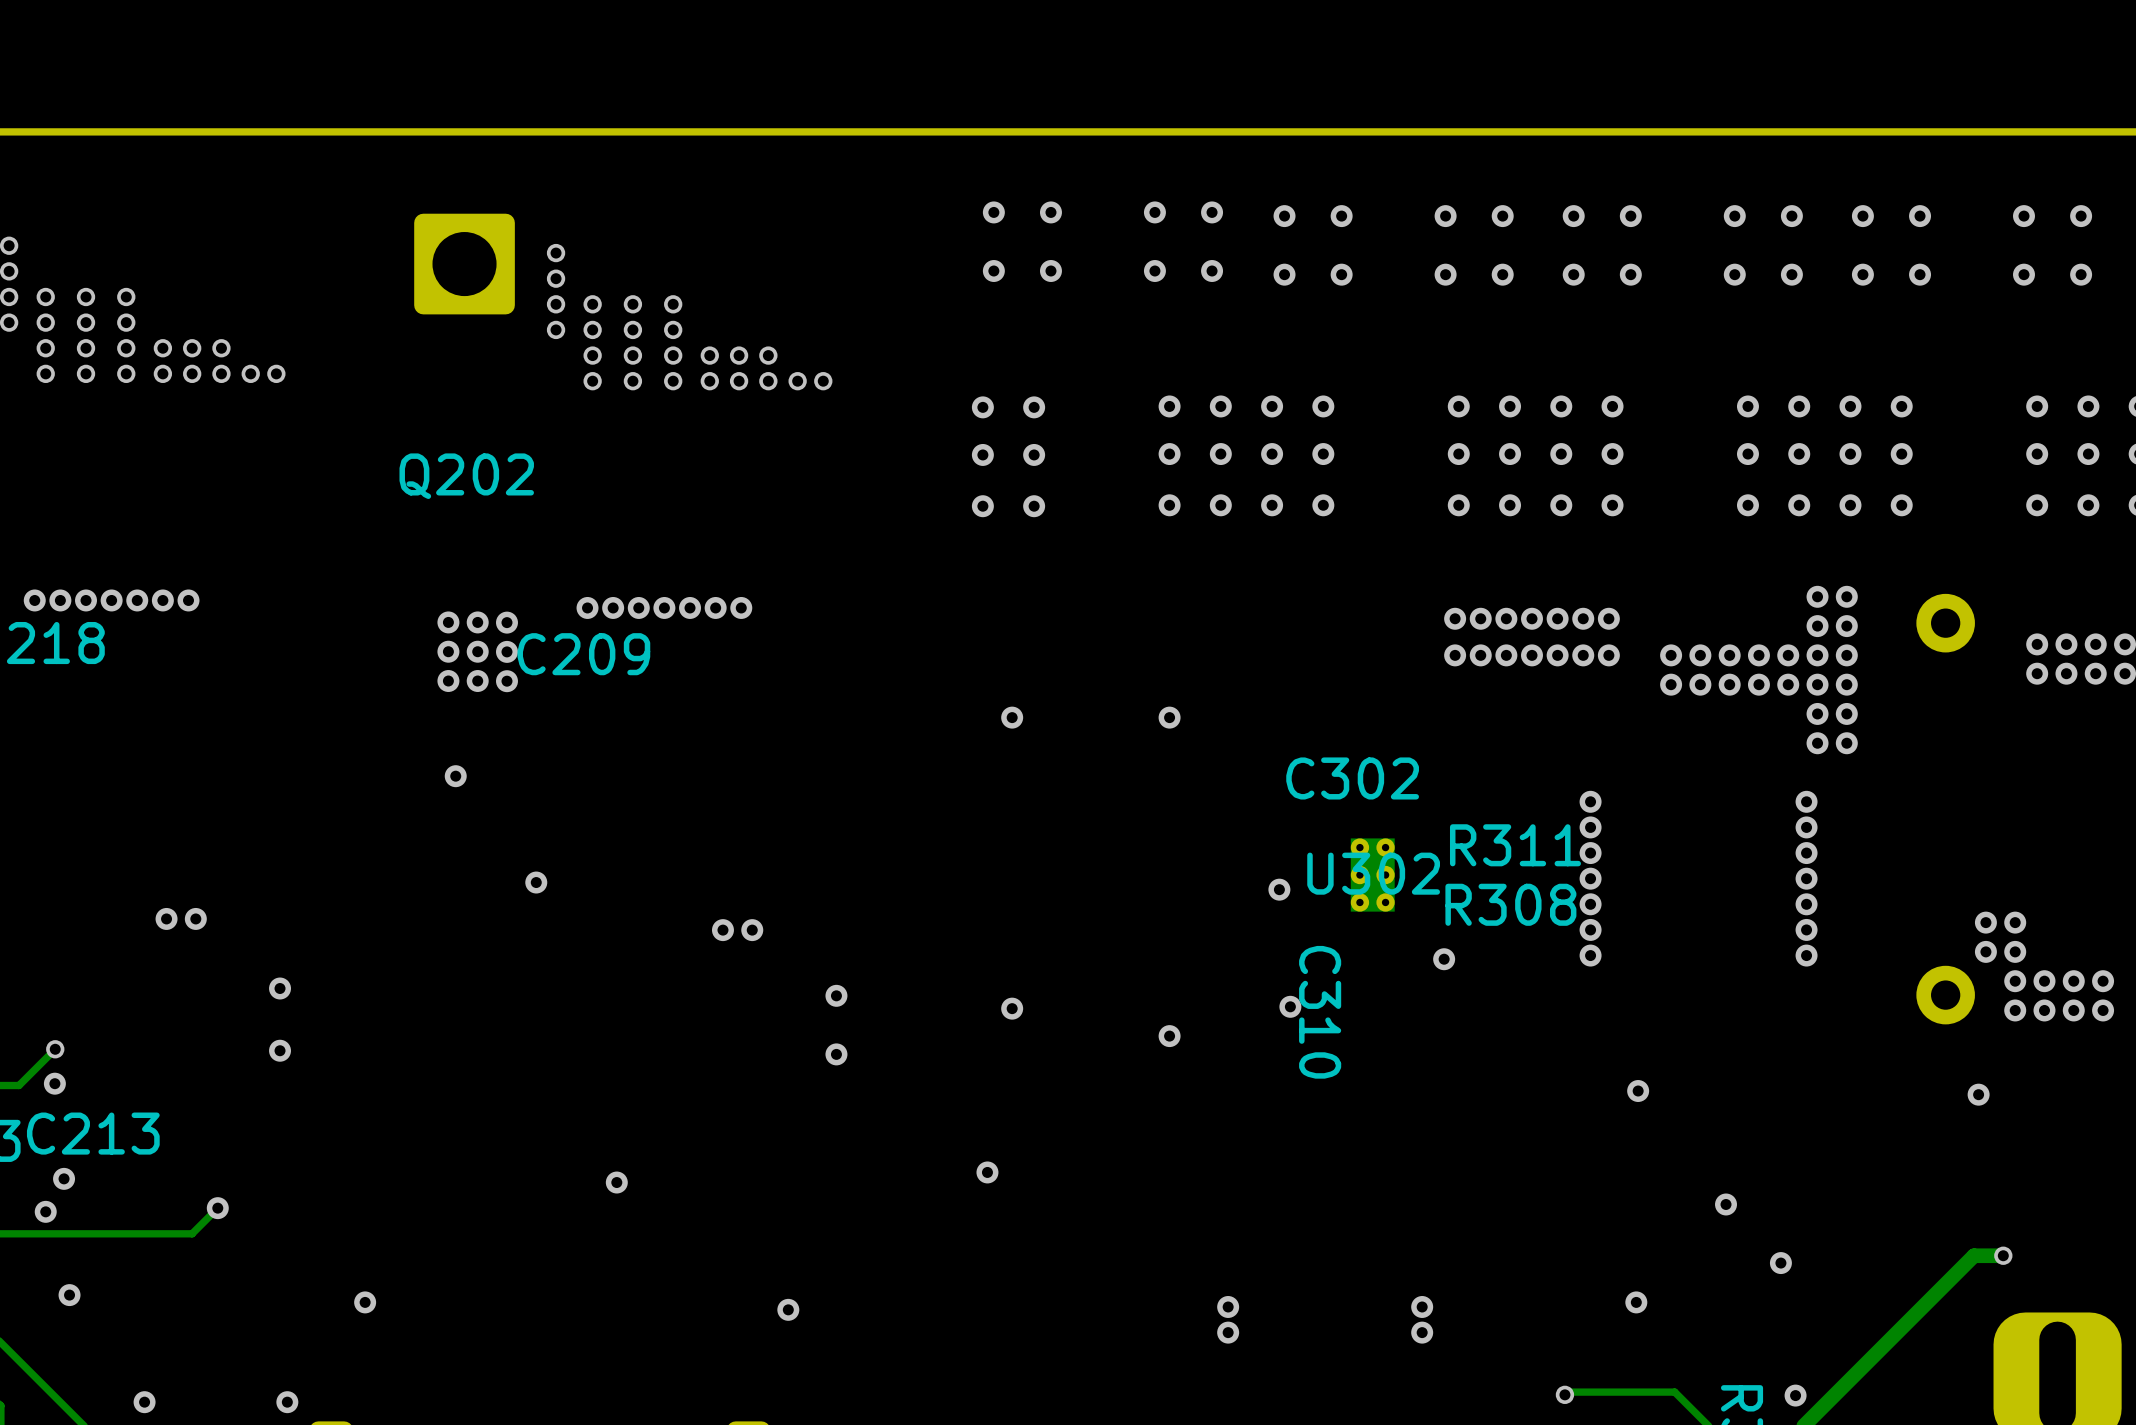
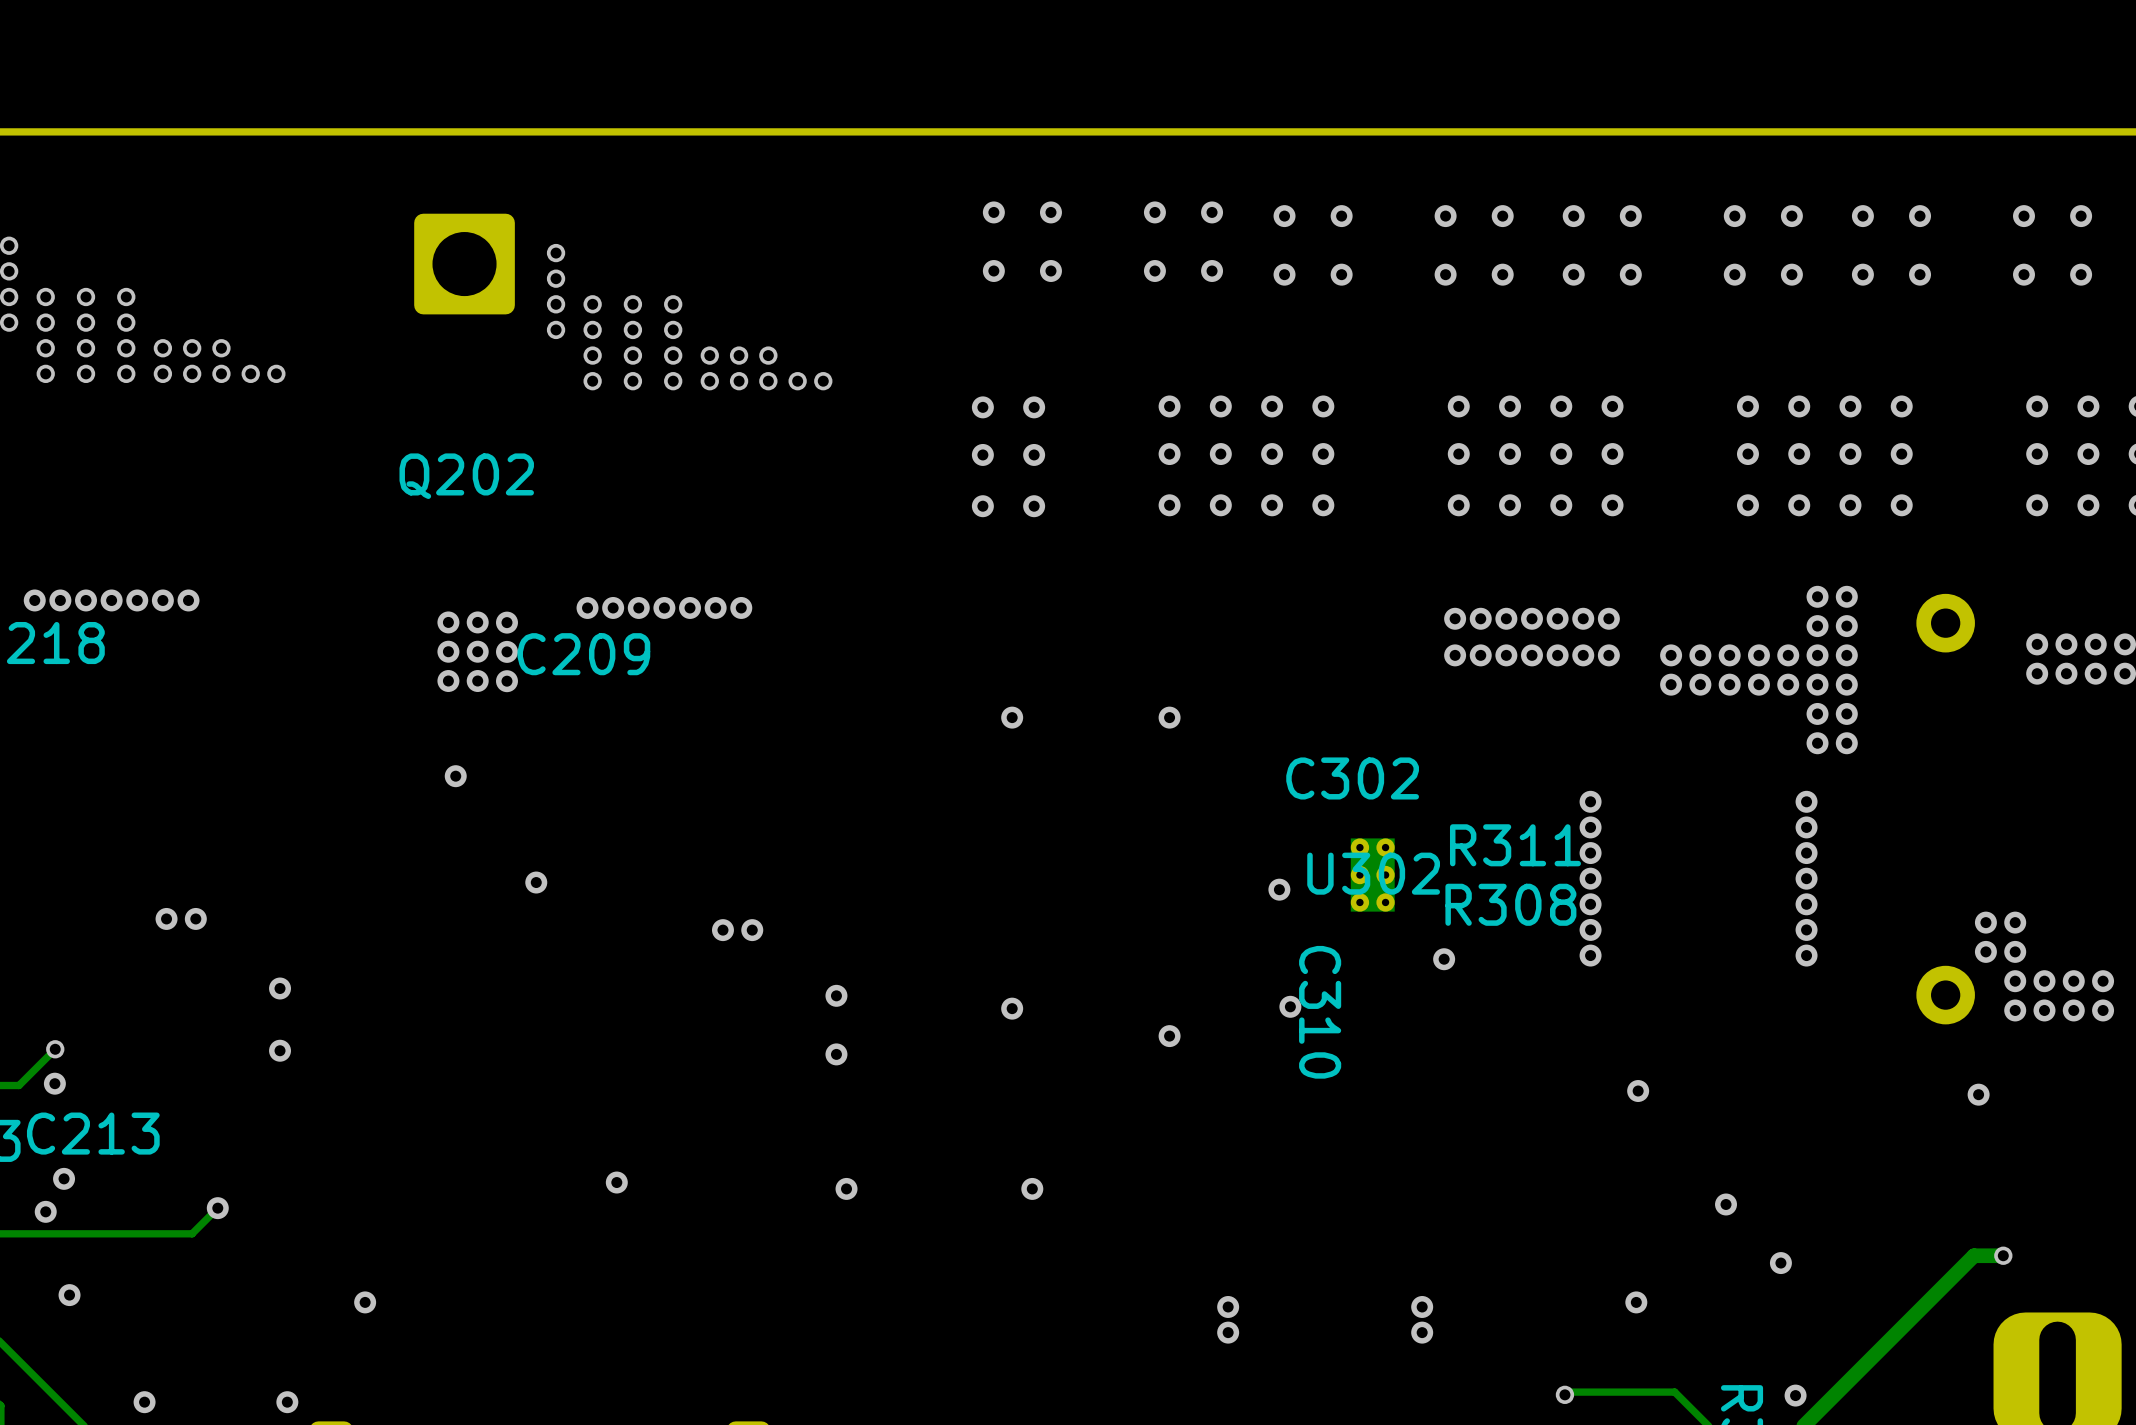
via position: (987, 1172) -> (1032, 1188)
via: none -> (846, 1188)
via: (788, 1309) -> none

